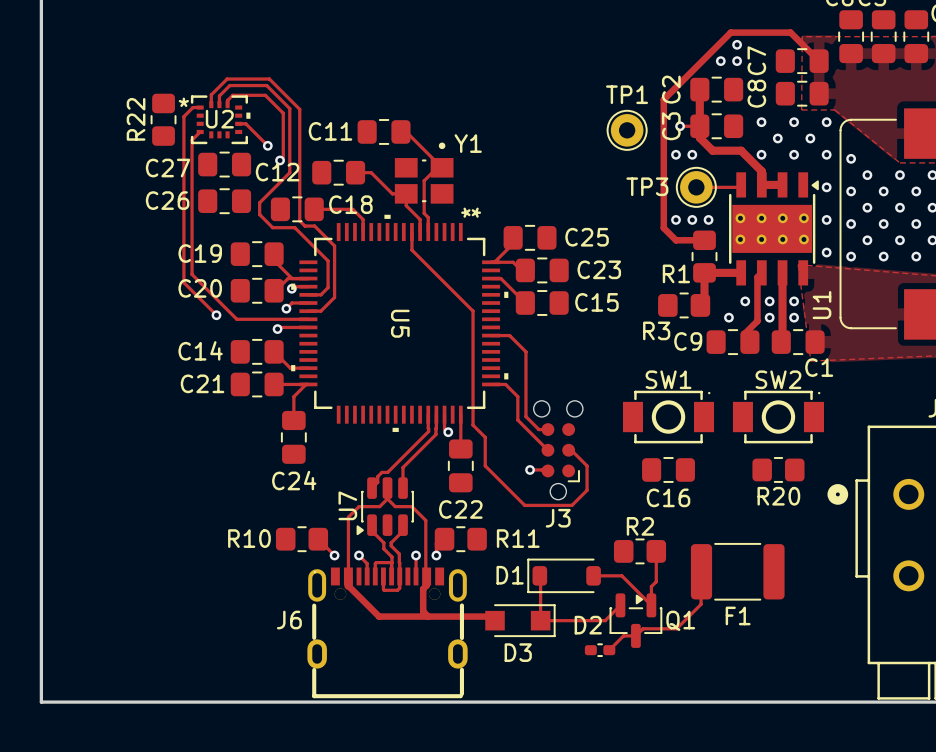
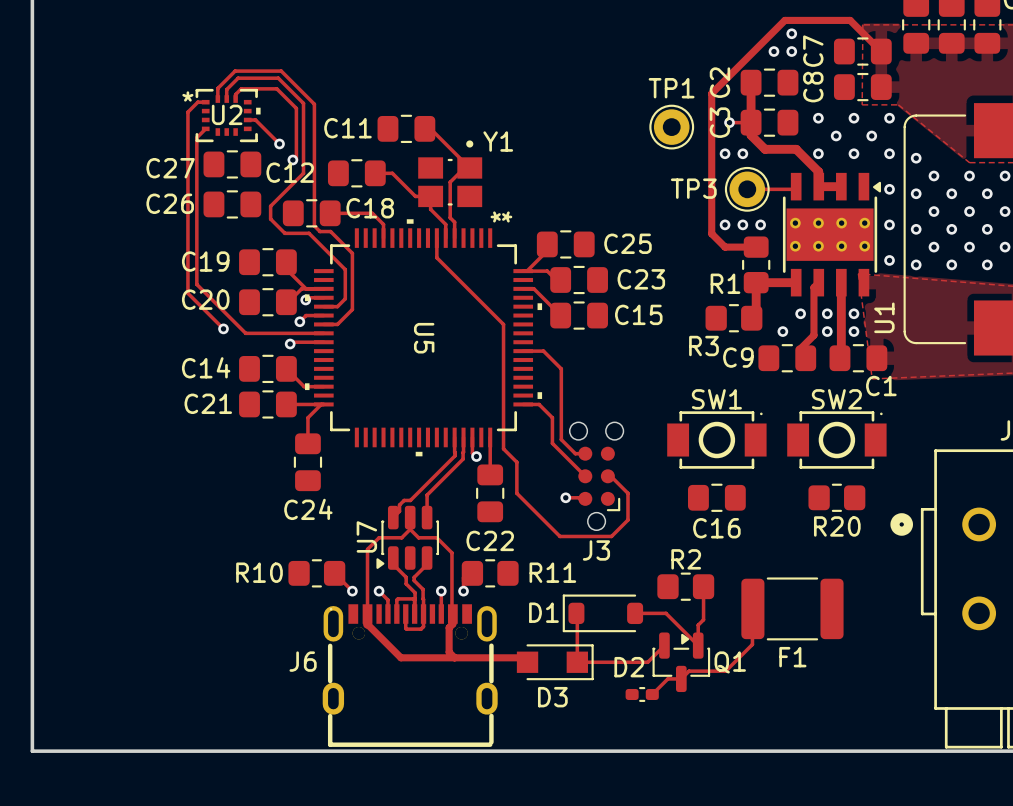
R22: (163, 119) -> none

